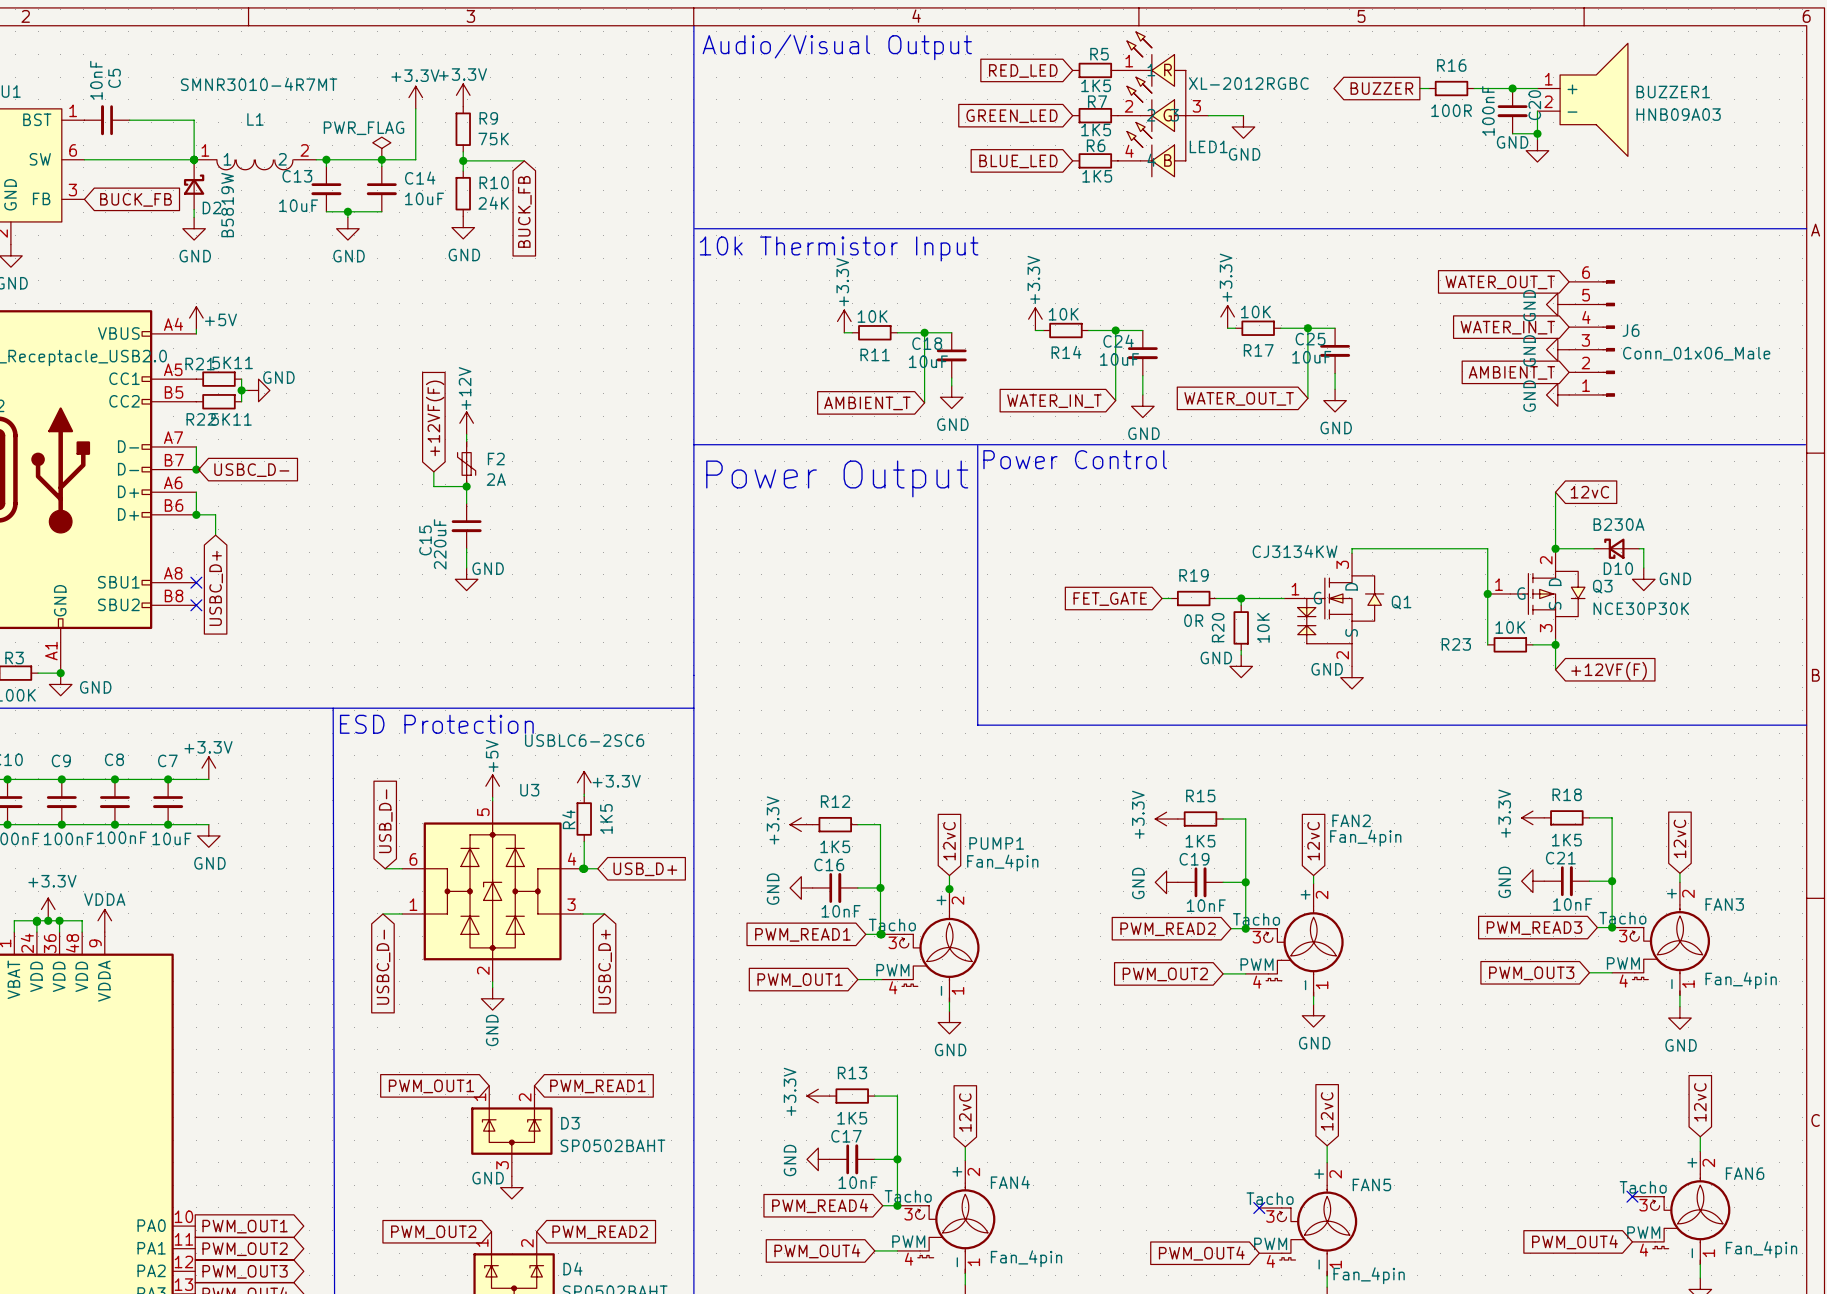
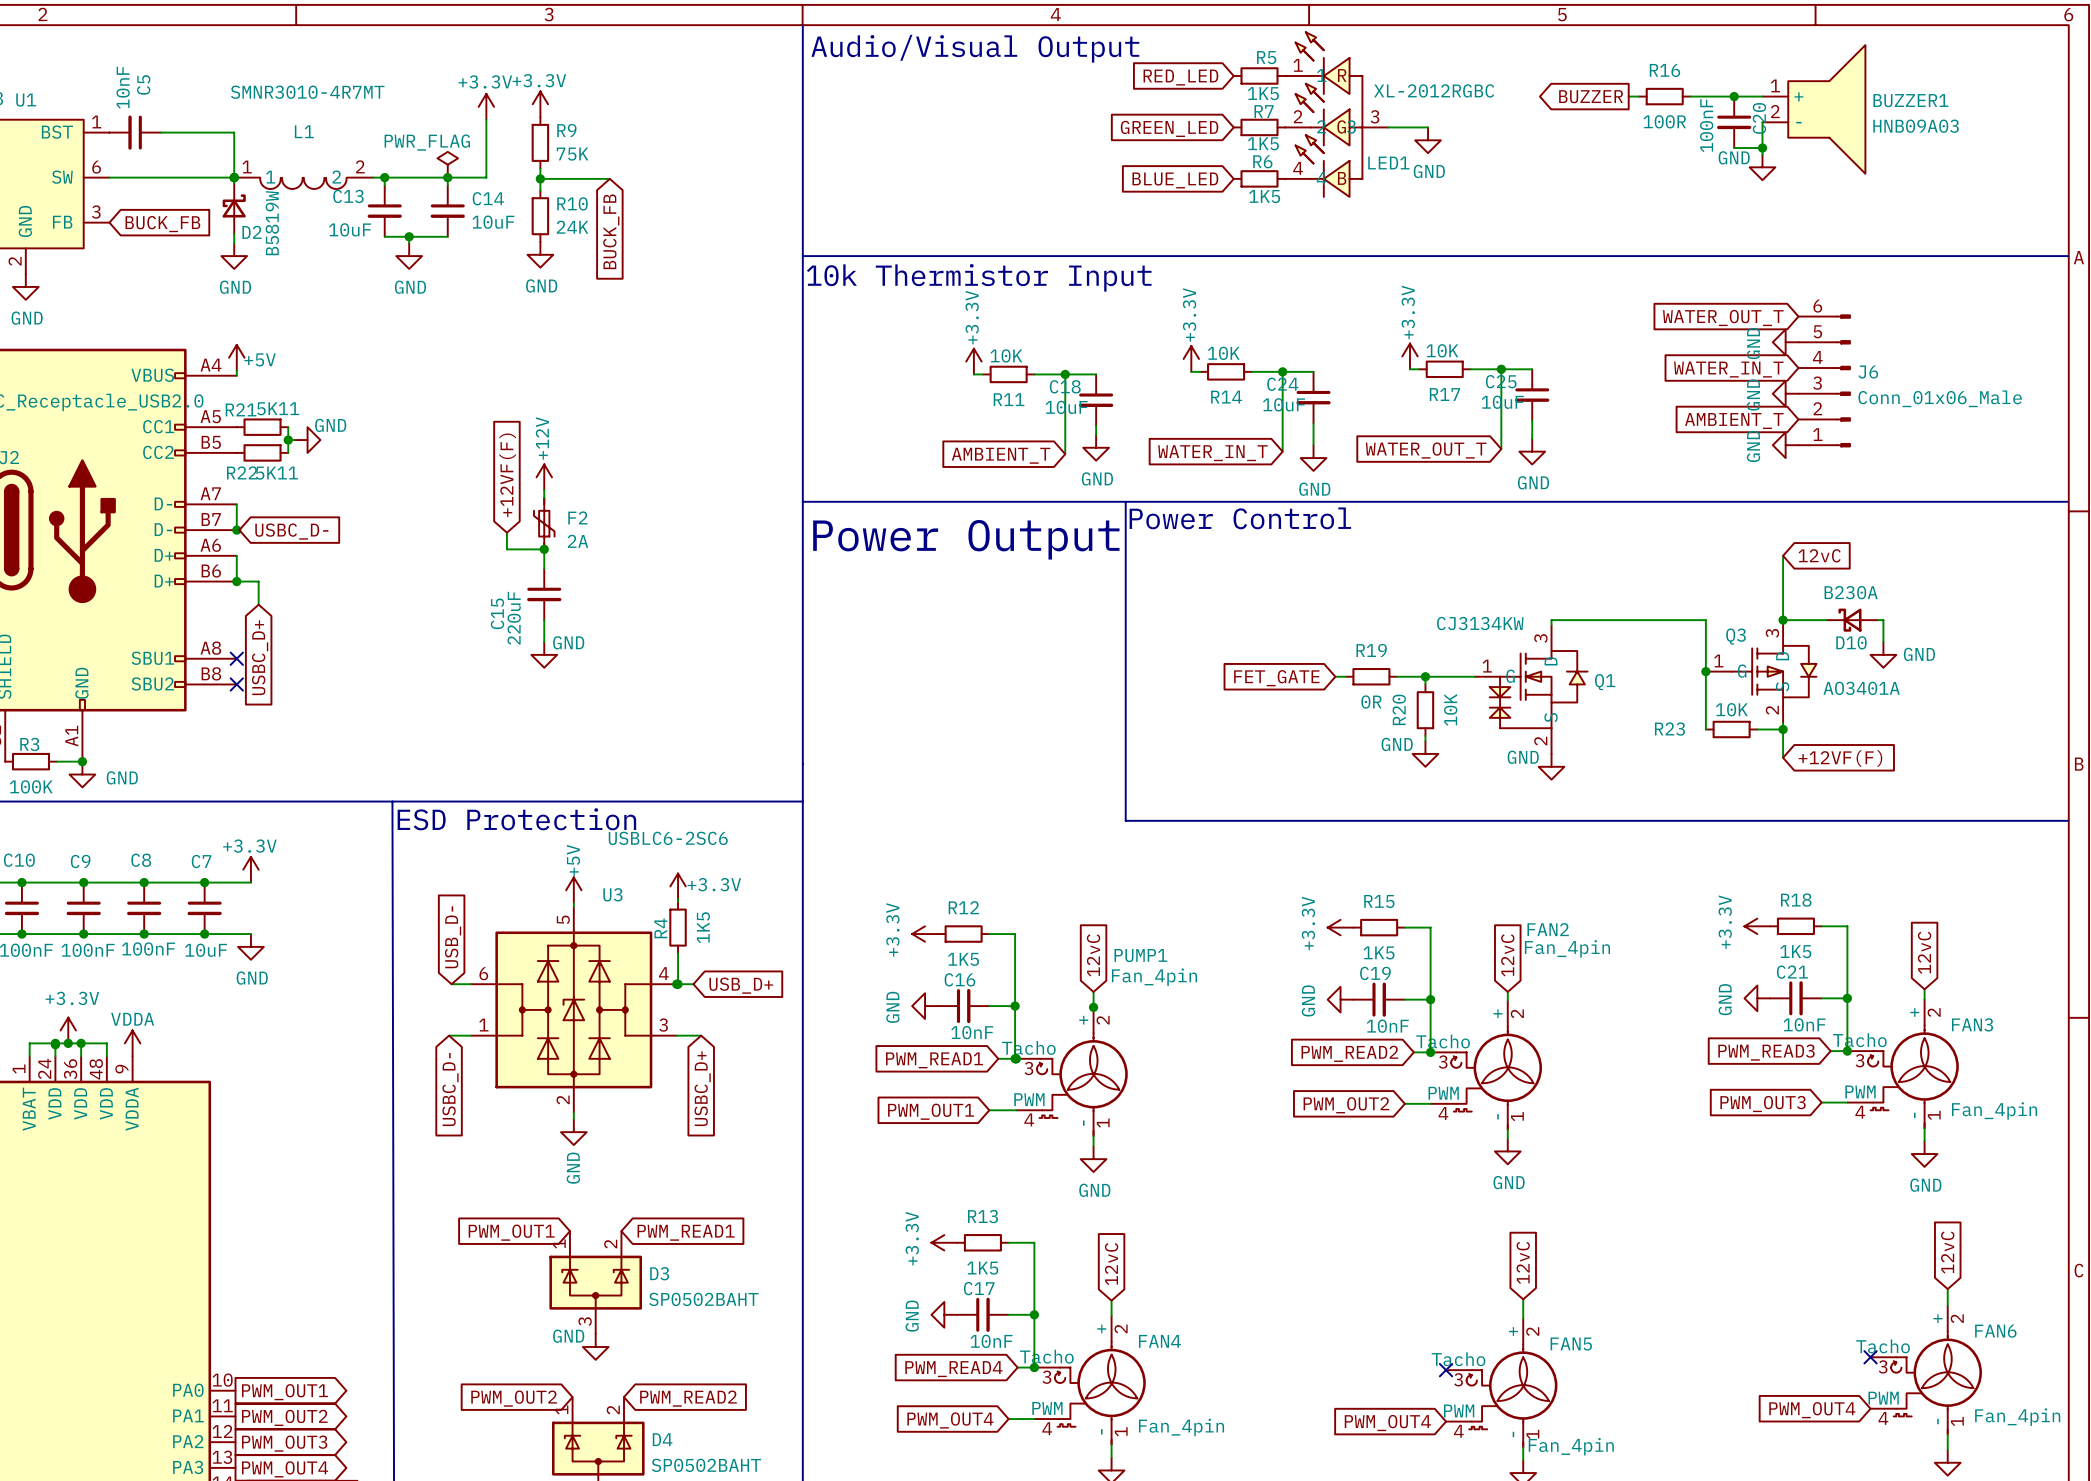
Q3 symbol: [1487, 548, 1585, 640] -> [1705, 620, 1817, 724]
Q3 name position: Q3 (1602, 586) -> Q3 (1736, 636)
Q3 value: NCE30P30K (1641, 608) -> AO3401A (1861, 688)

